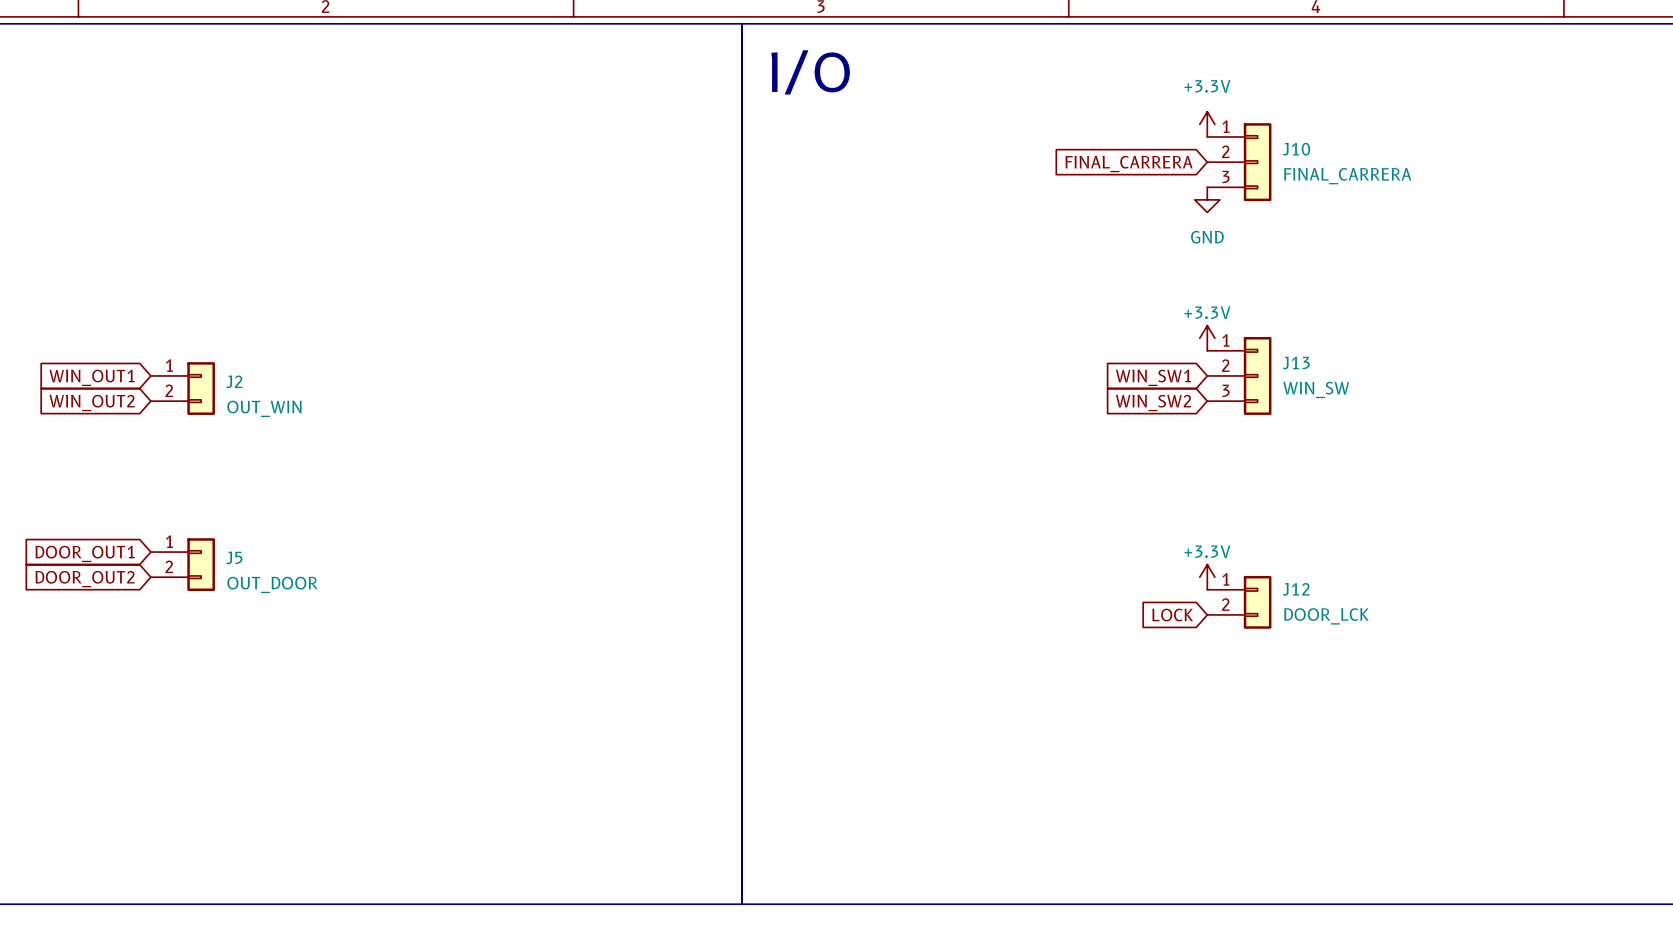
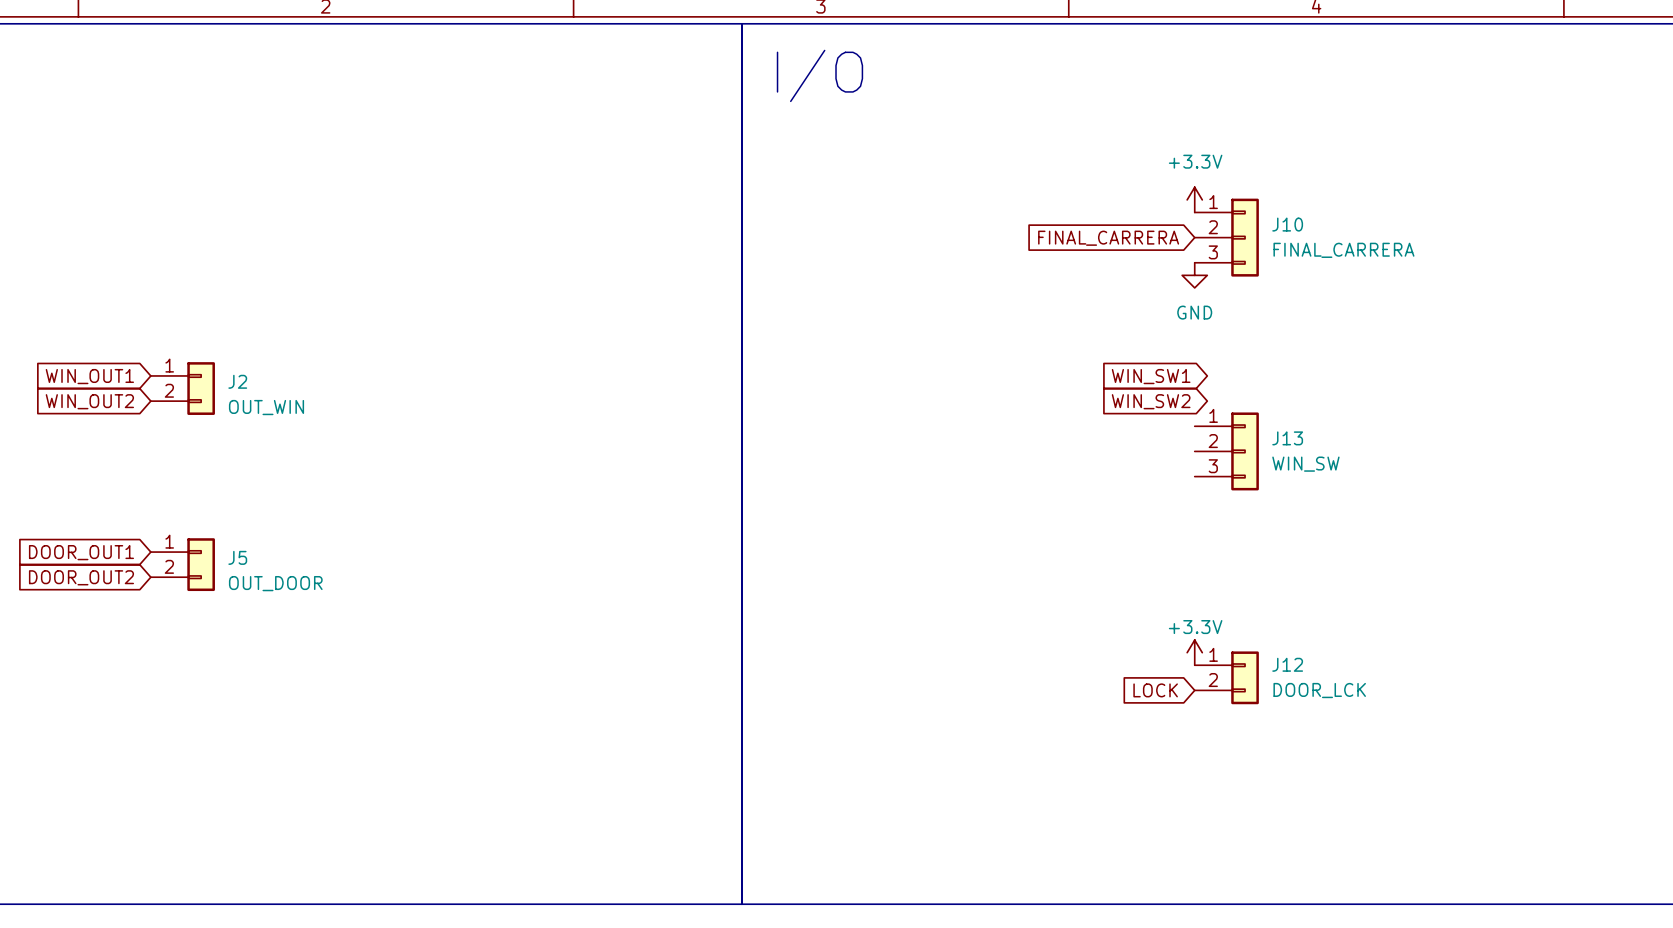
power symbol: +3.3V (1207, 124) -> none
J10 position: (1239, 162) -> (1226, 237)
global label position: FINAL_CARRERA (1129, 164) -> FINAL_CARRERA (1108, 238)
power symbol: none -> +3.3V (1194, 199)
power symbol position: GND (1207, 199) -> GND (1194, 275)
power symbol: +3.3V (1207, 338) -> none
J13 position: (1239, 375) -> (1226, 451)
power symbol position: +3.3V (1207, 577) -> +3.3V (1194, 652)
J12 position: (1239, 602) -> (1226, 677)
global label position: LOCK (1172, 615) -> LOCK (1155, 690)

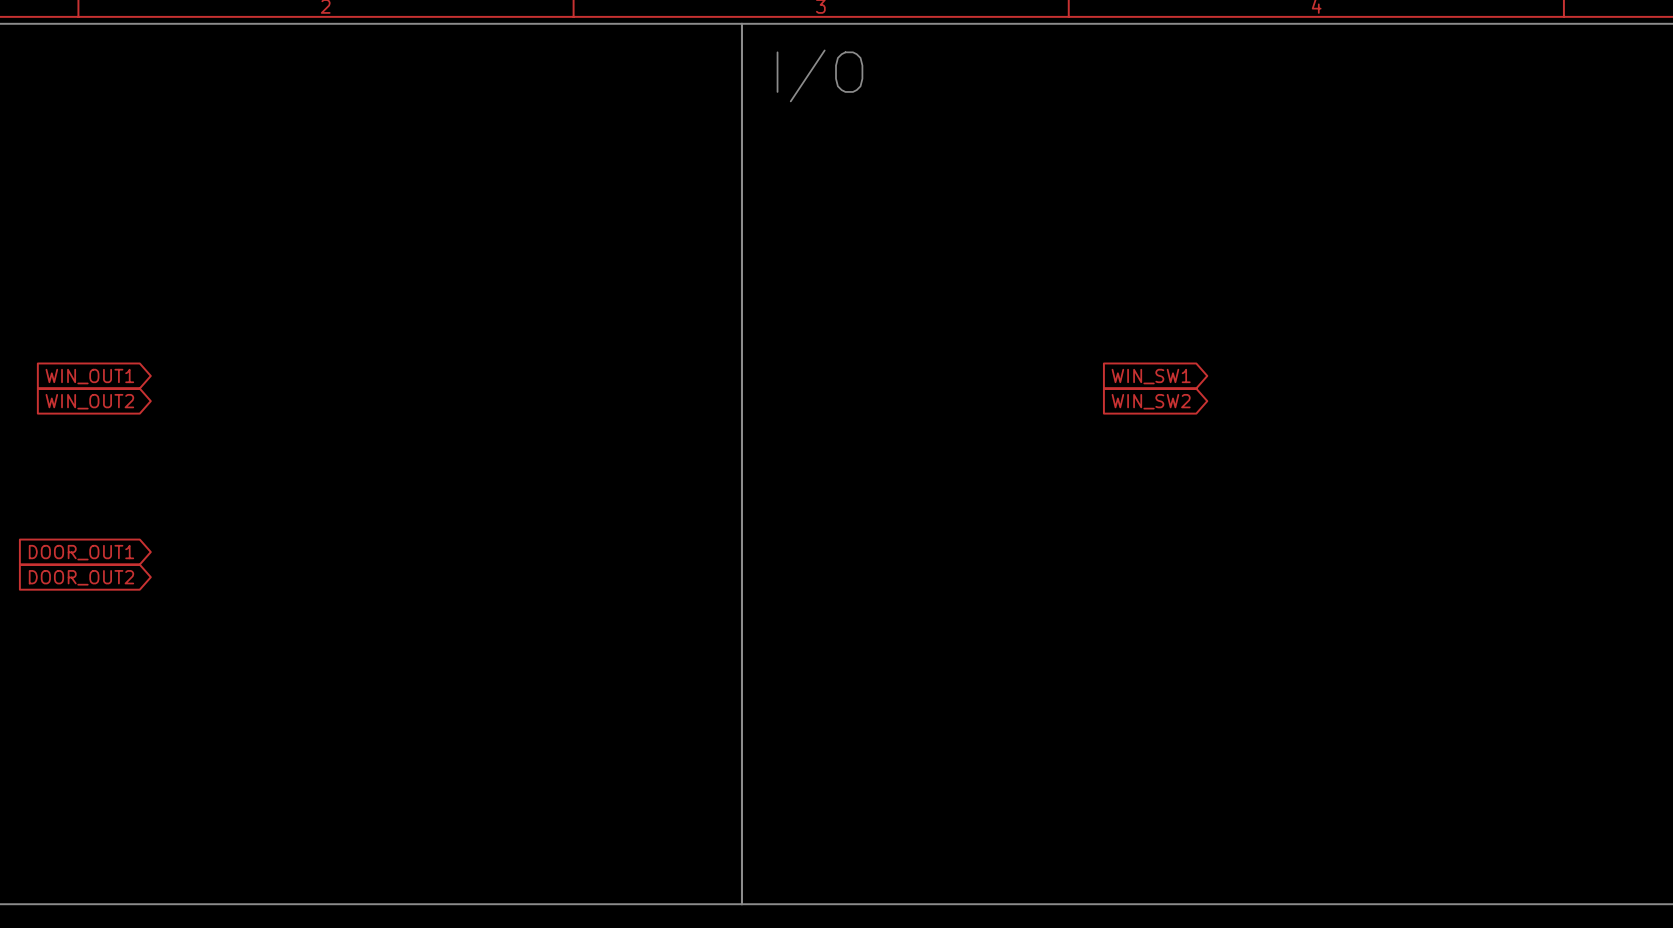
power symbol: +3.3V (1194, 199) -> none
J10: FINAL_CARRERA (1226, 237) -> none
global label: FINAL_CARRERA (1108, 238) -> none
power symbol: GND (1194, 275) -> none
J2: OUT_WIN (182, 388) -> none
J13: WIN_SW (1226, 451) -> none
J5: OUT_DOOR (182, 564) -> none
power symbol: +3.3V (1194, 652) -> none
J12: DOOR_LCK (1226, 677) -> none
global label: LOCK (1155, 690) -> none

